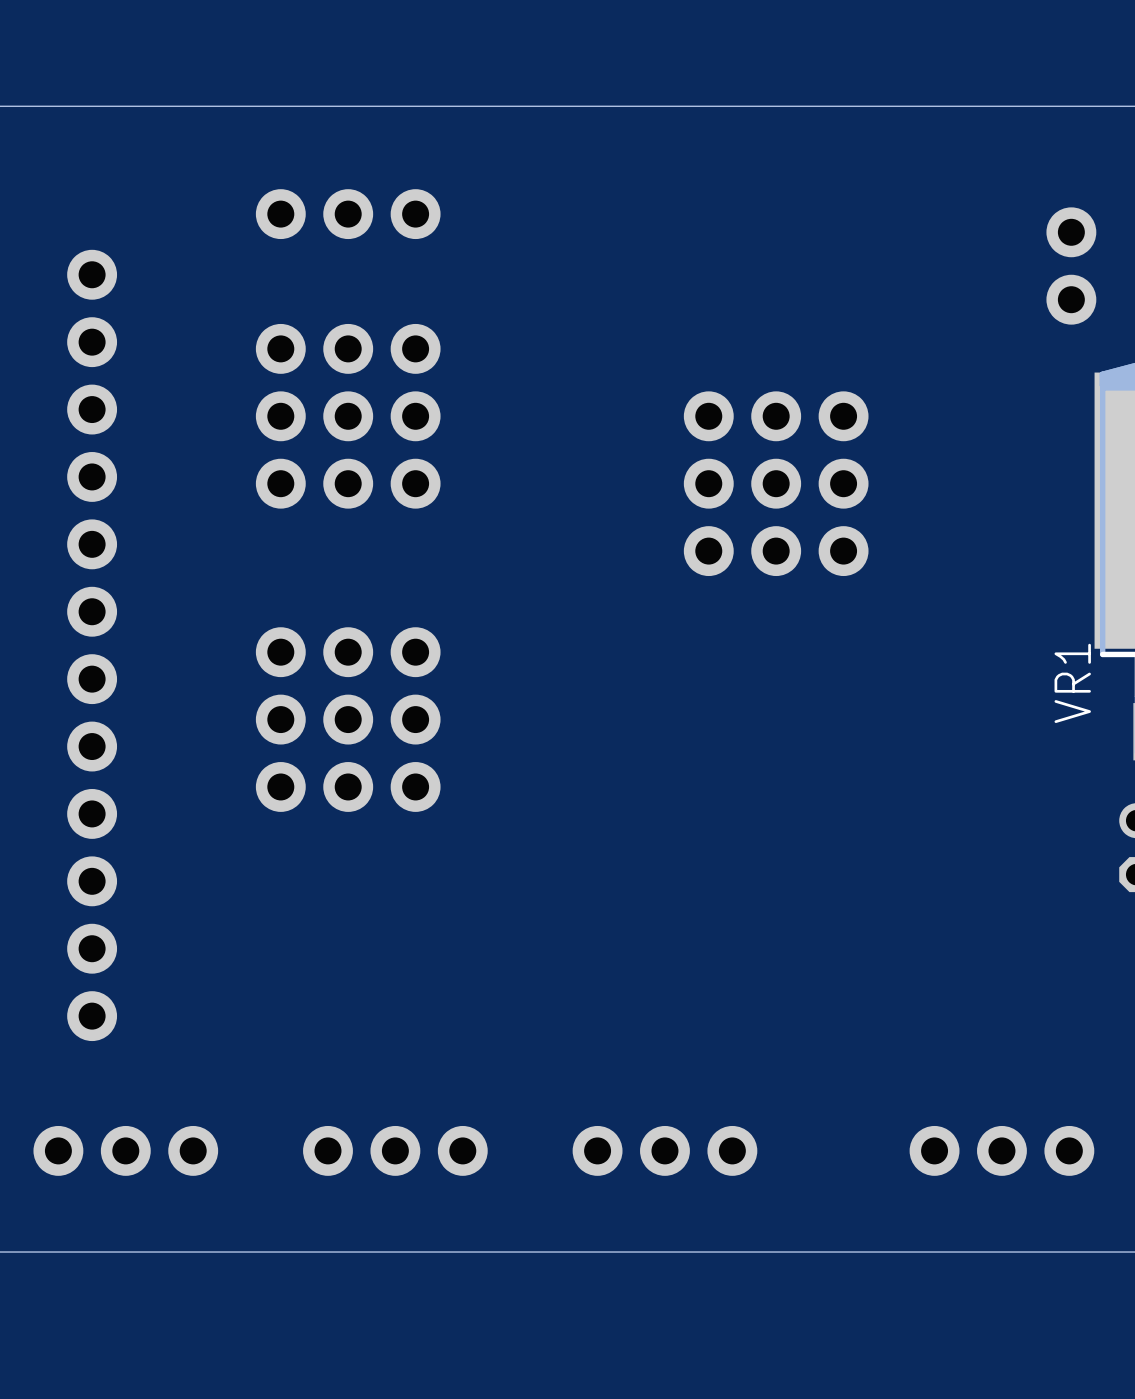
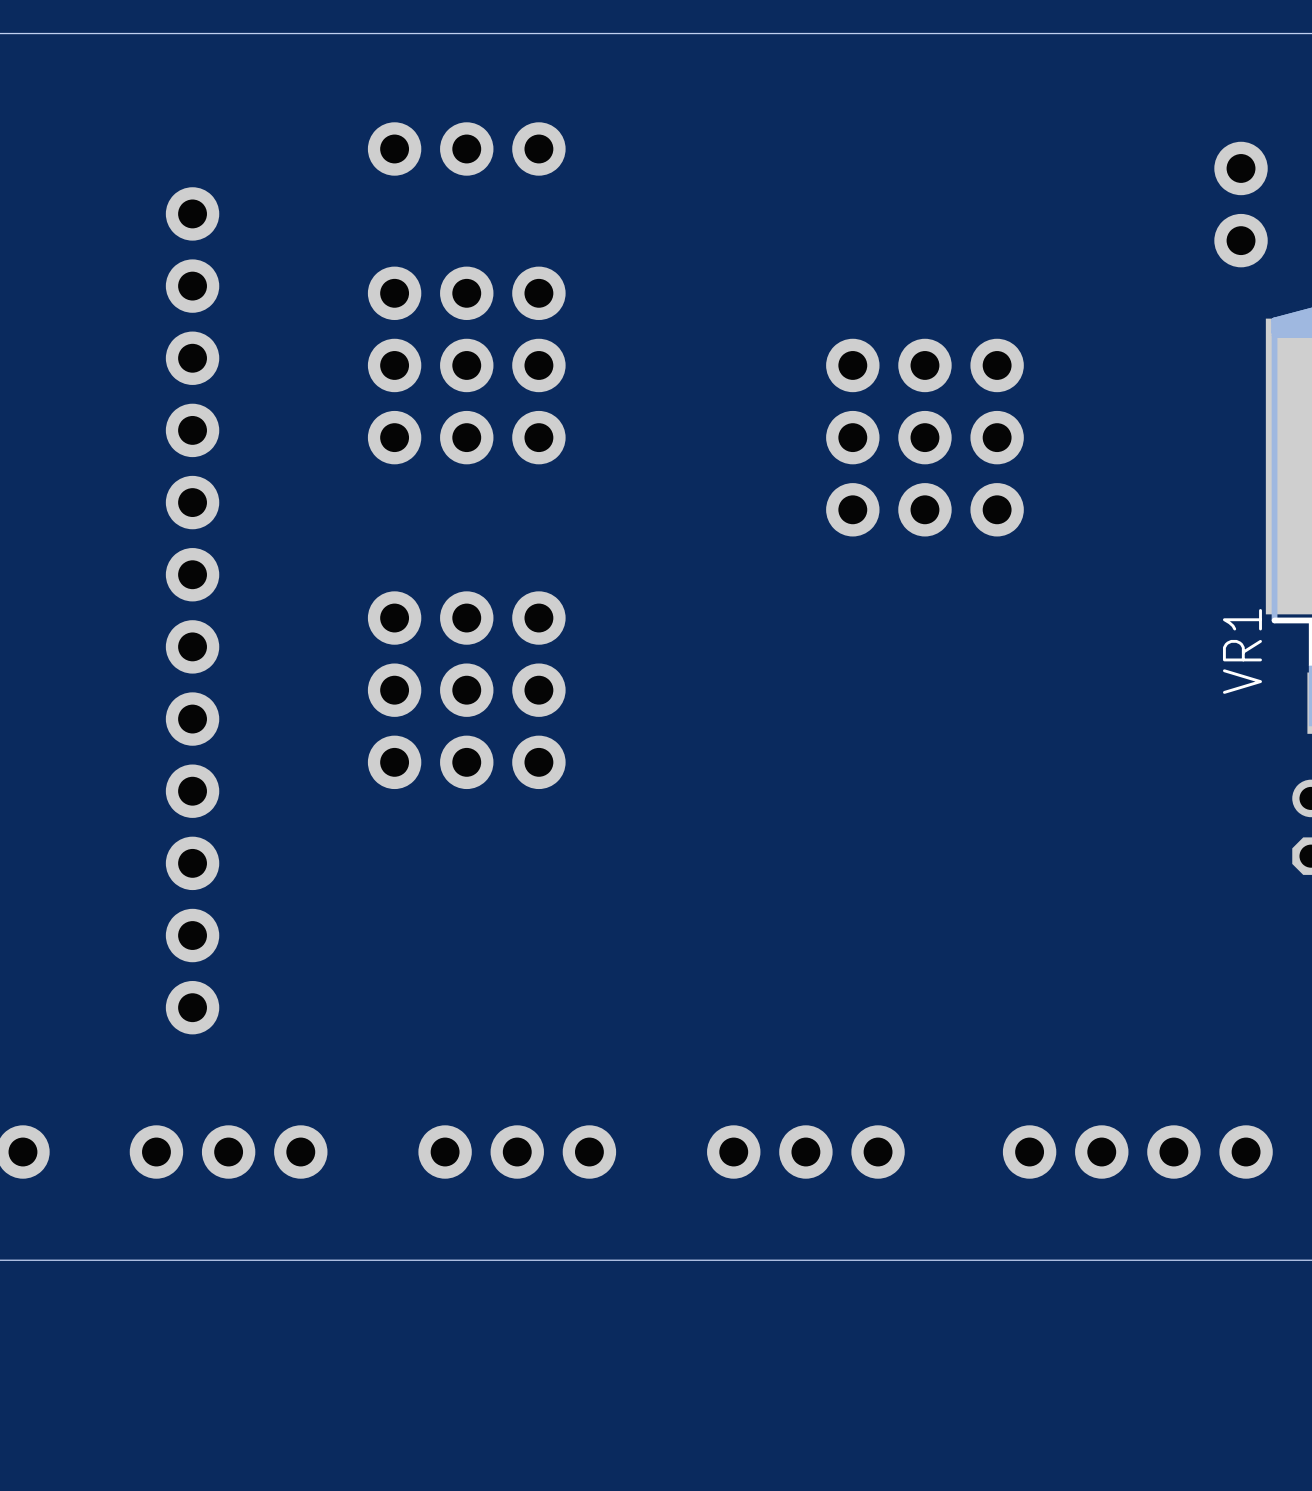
part: none -> (1137, 1152)
part: (1001, 1150) -> none

